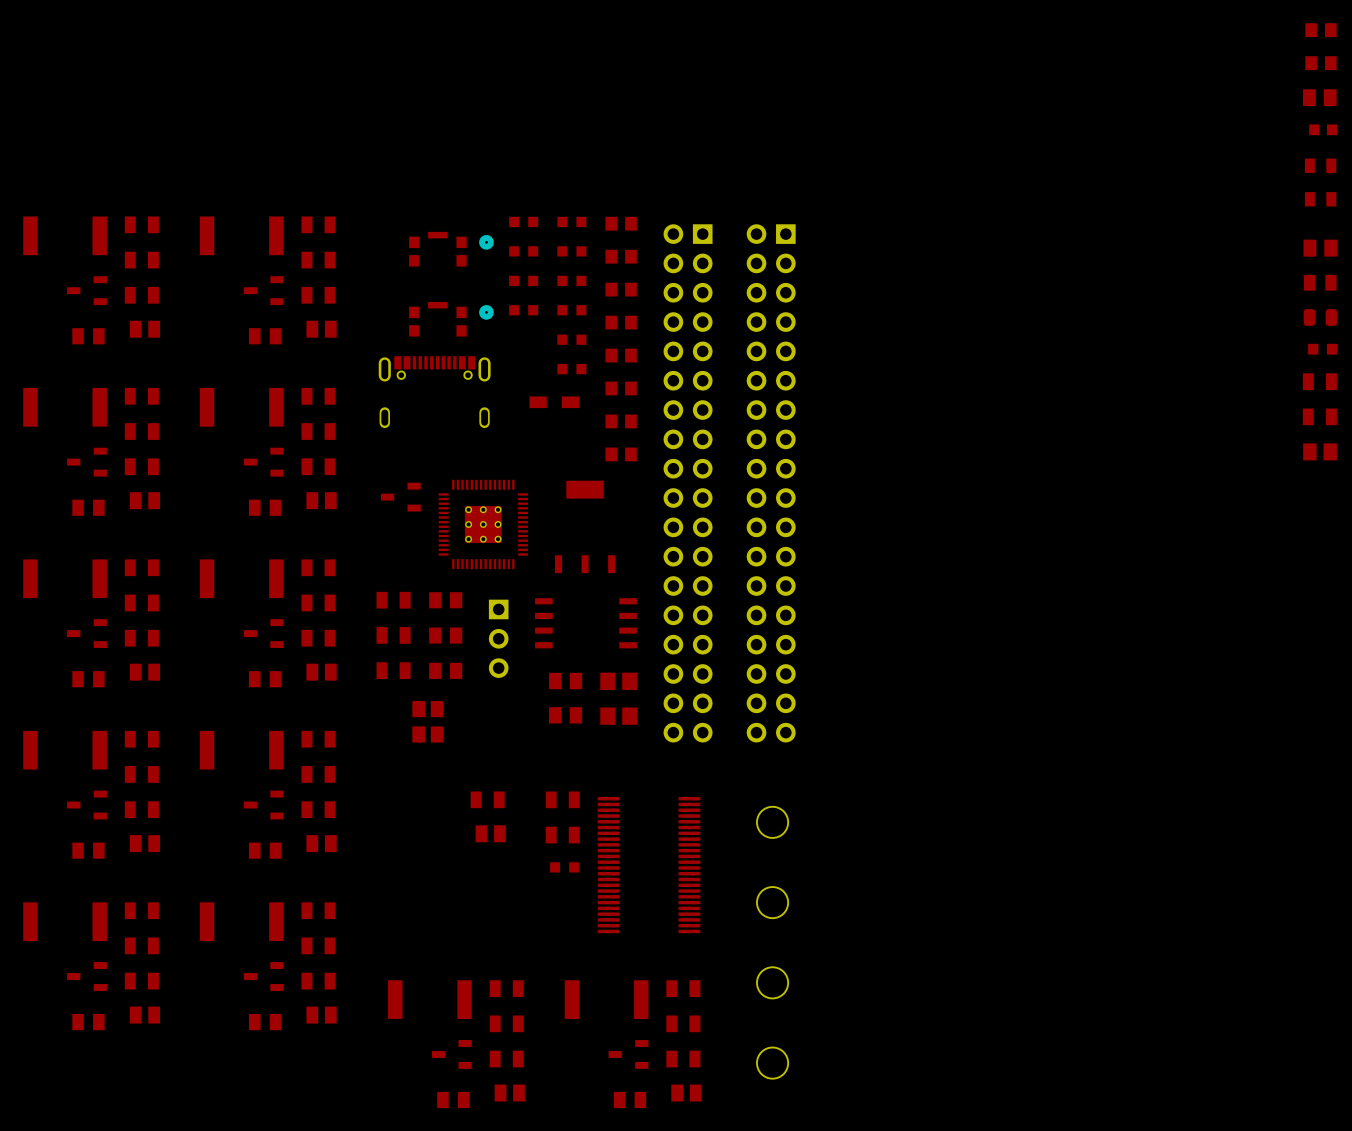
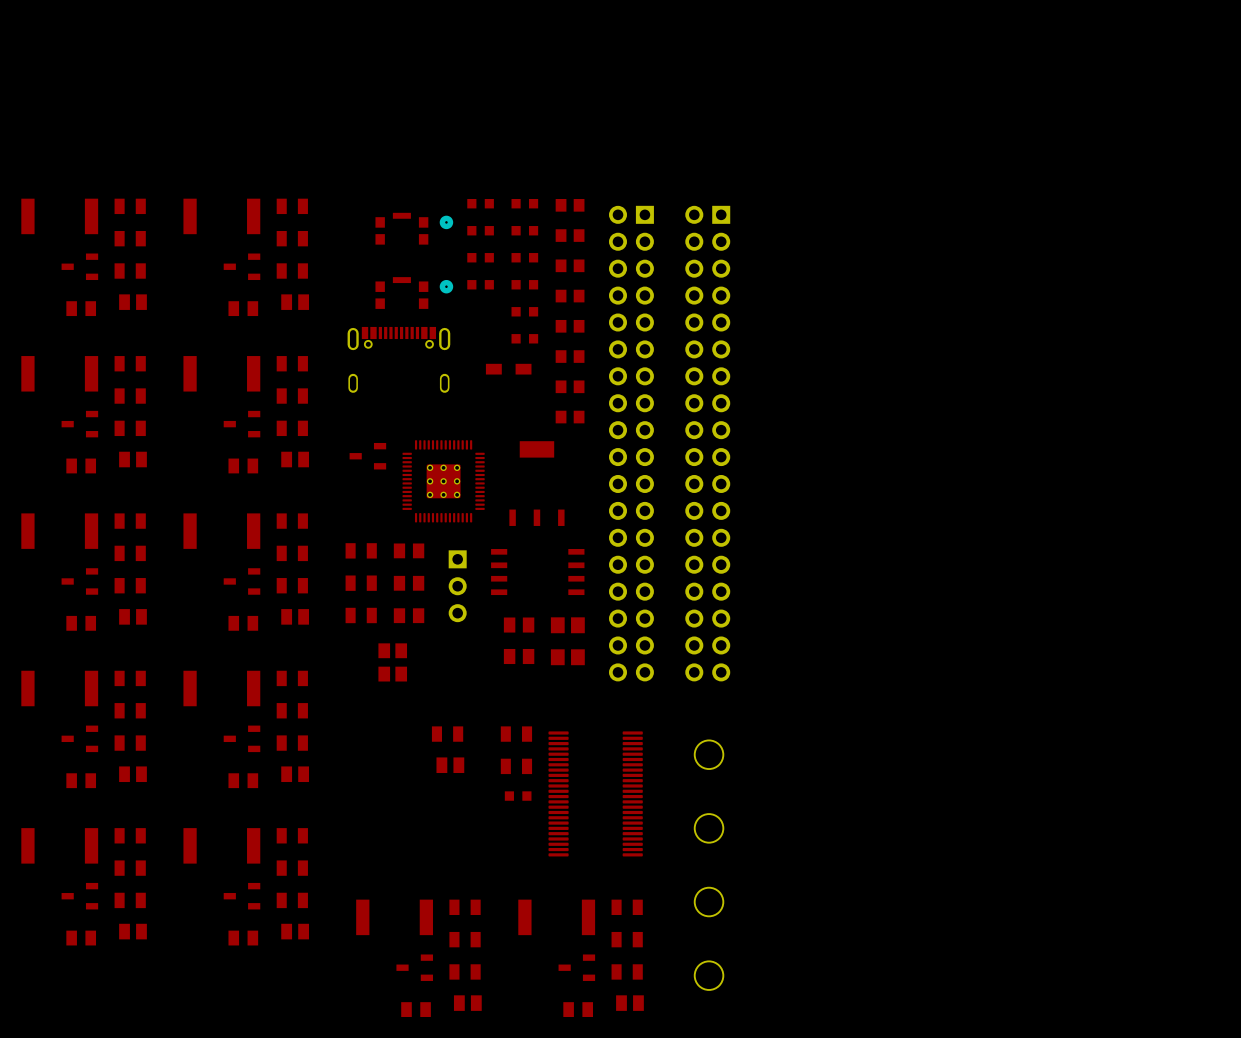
part: (1320, 30) -> none
part: (1320, 63) -> none
part: (1319, 97) -> none
part: (1323, 129) -> none
part: (1320, 165) -> none
part: (1320, 199) -> none
part: (1320, 248) -> none
part: (1320, 282) -> none
part: (1320, 317) -> none
part: (1322, 349) -> none
part: (1319, 381) -> none
part: (1319, 416) -> none
part: (1320, 451) -> none

